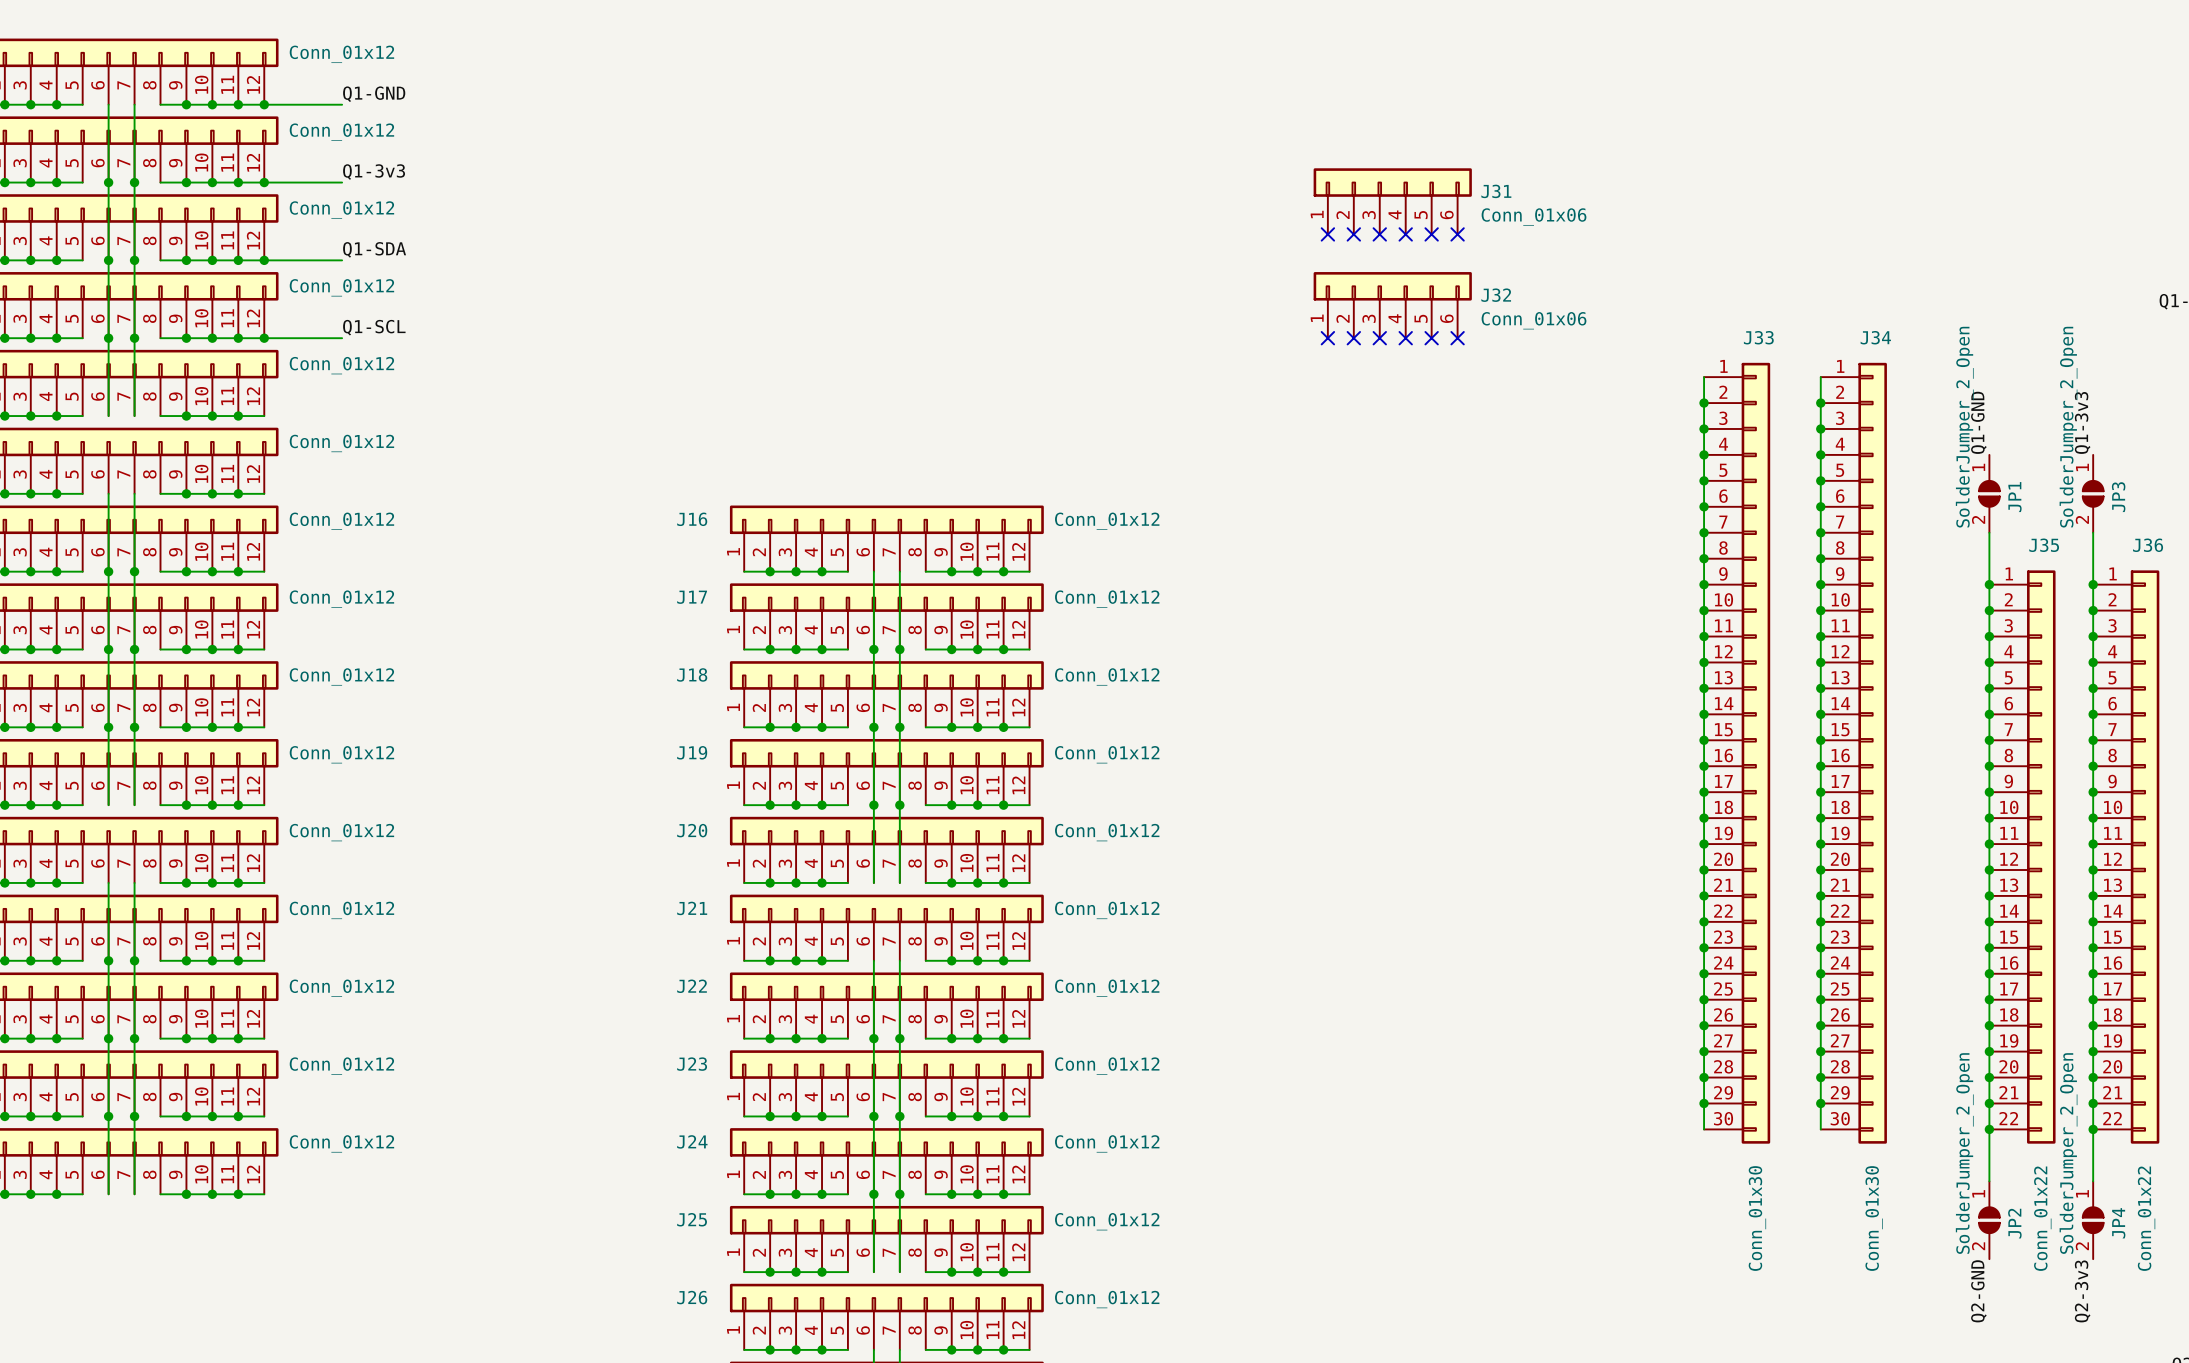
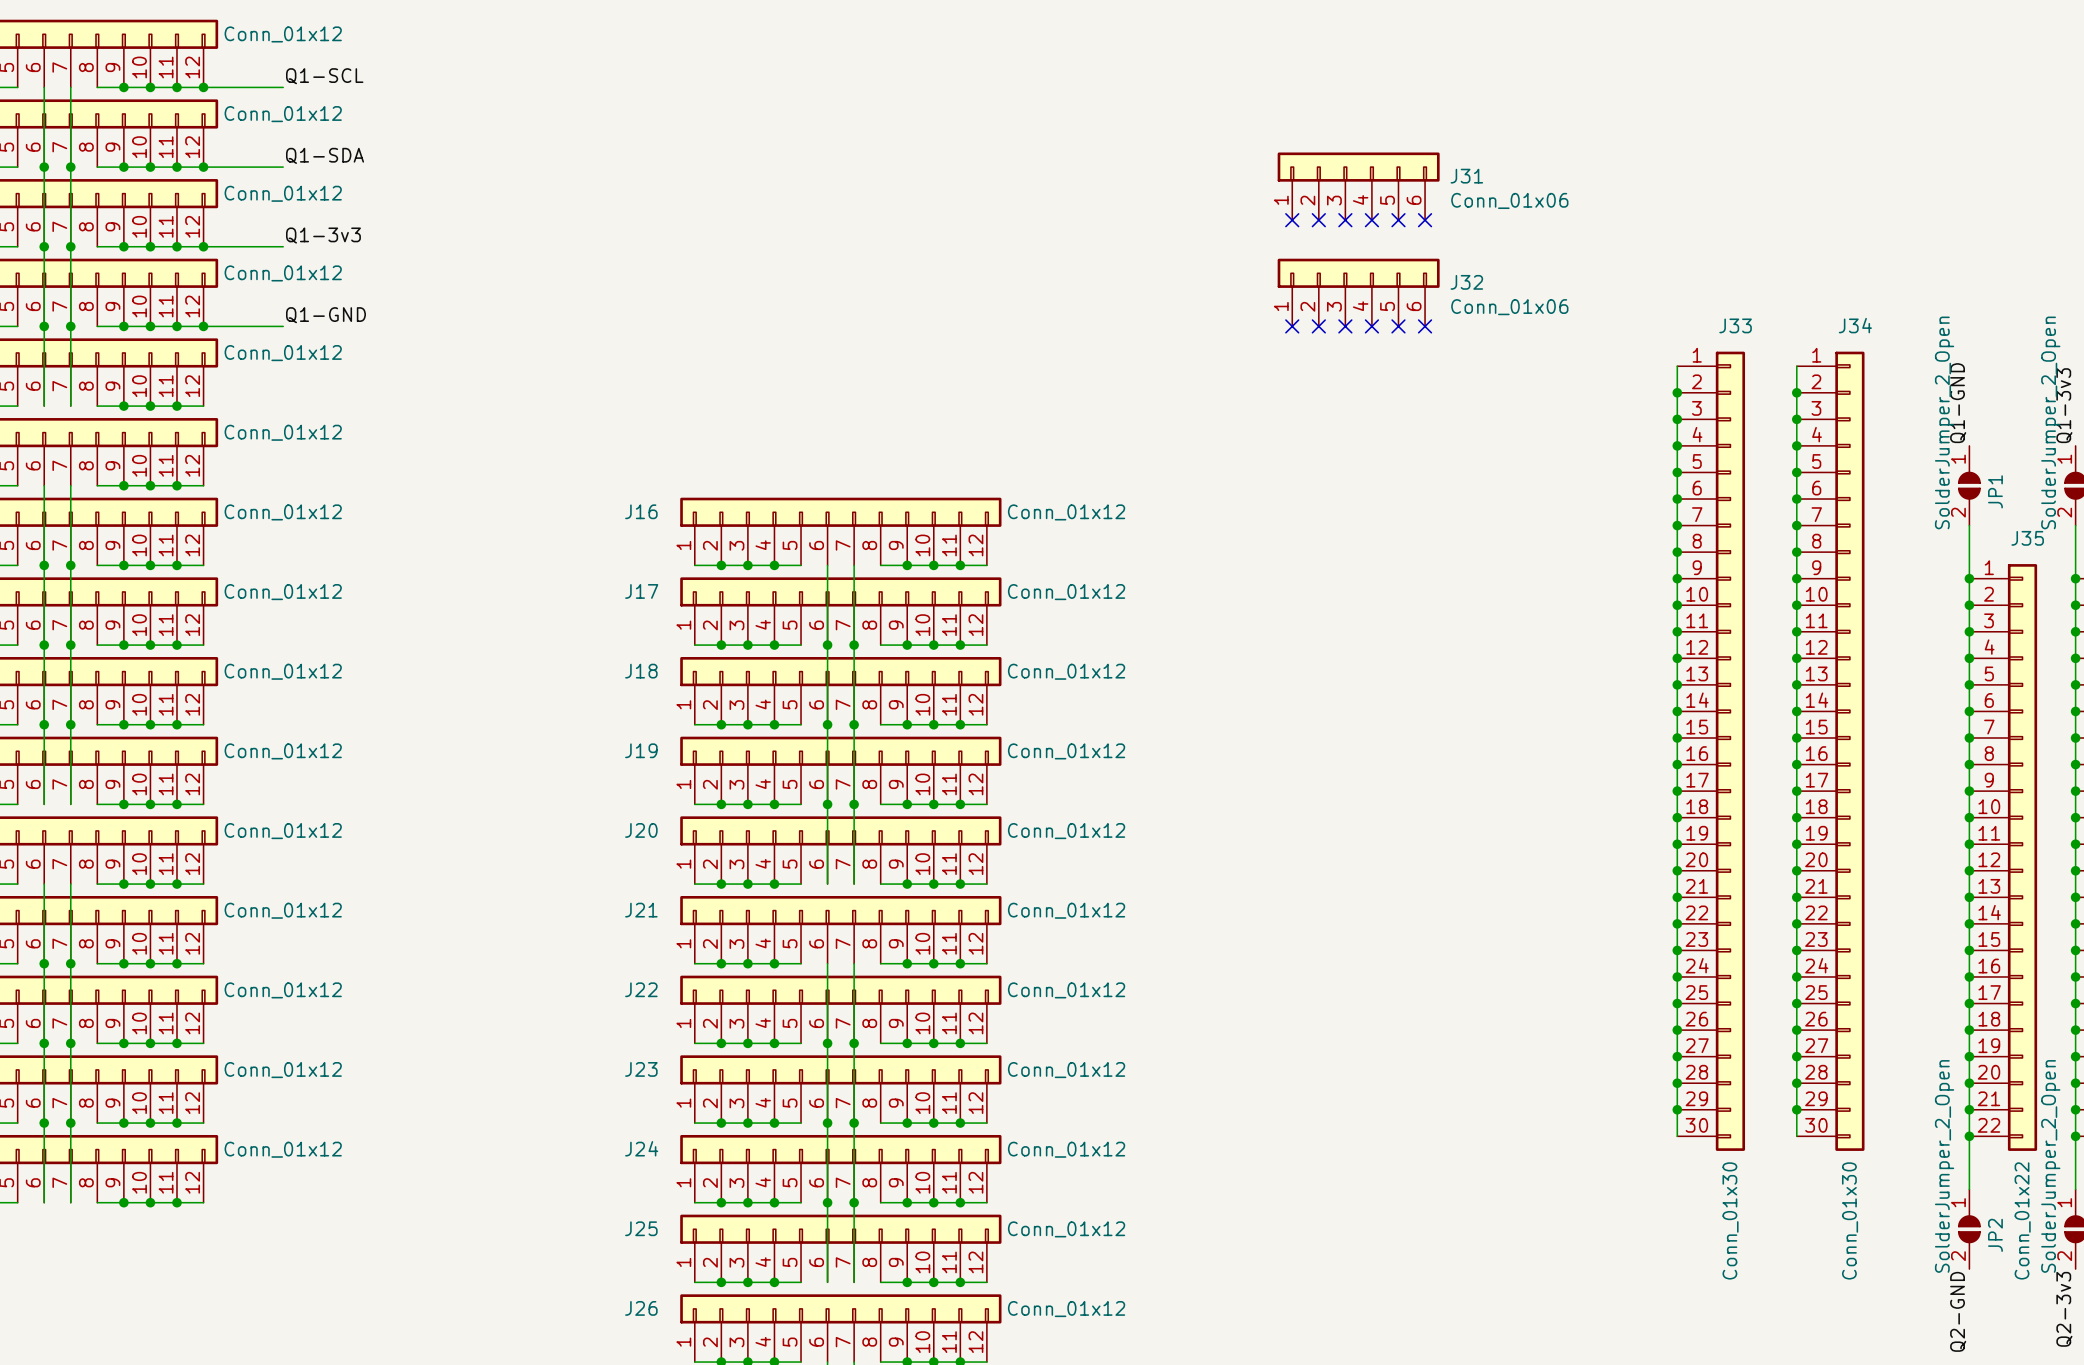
label: Q1-GND (374, 94) -> Q1-SCL (324, 76)
label: Q1-3v3 (374, 172) -> Q1-SDA (325, 155)
label: Q1-SDA (374, 249) -> Q1-3v3 (323, 235)
label: Q1-SCL (374, 327) -> Q1-GND (325, 315)

